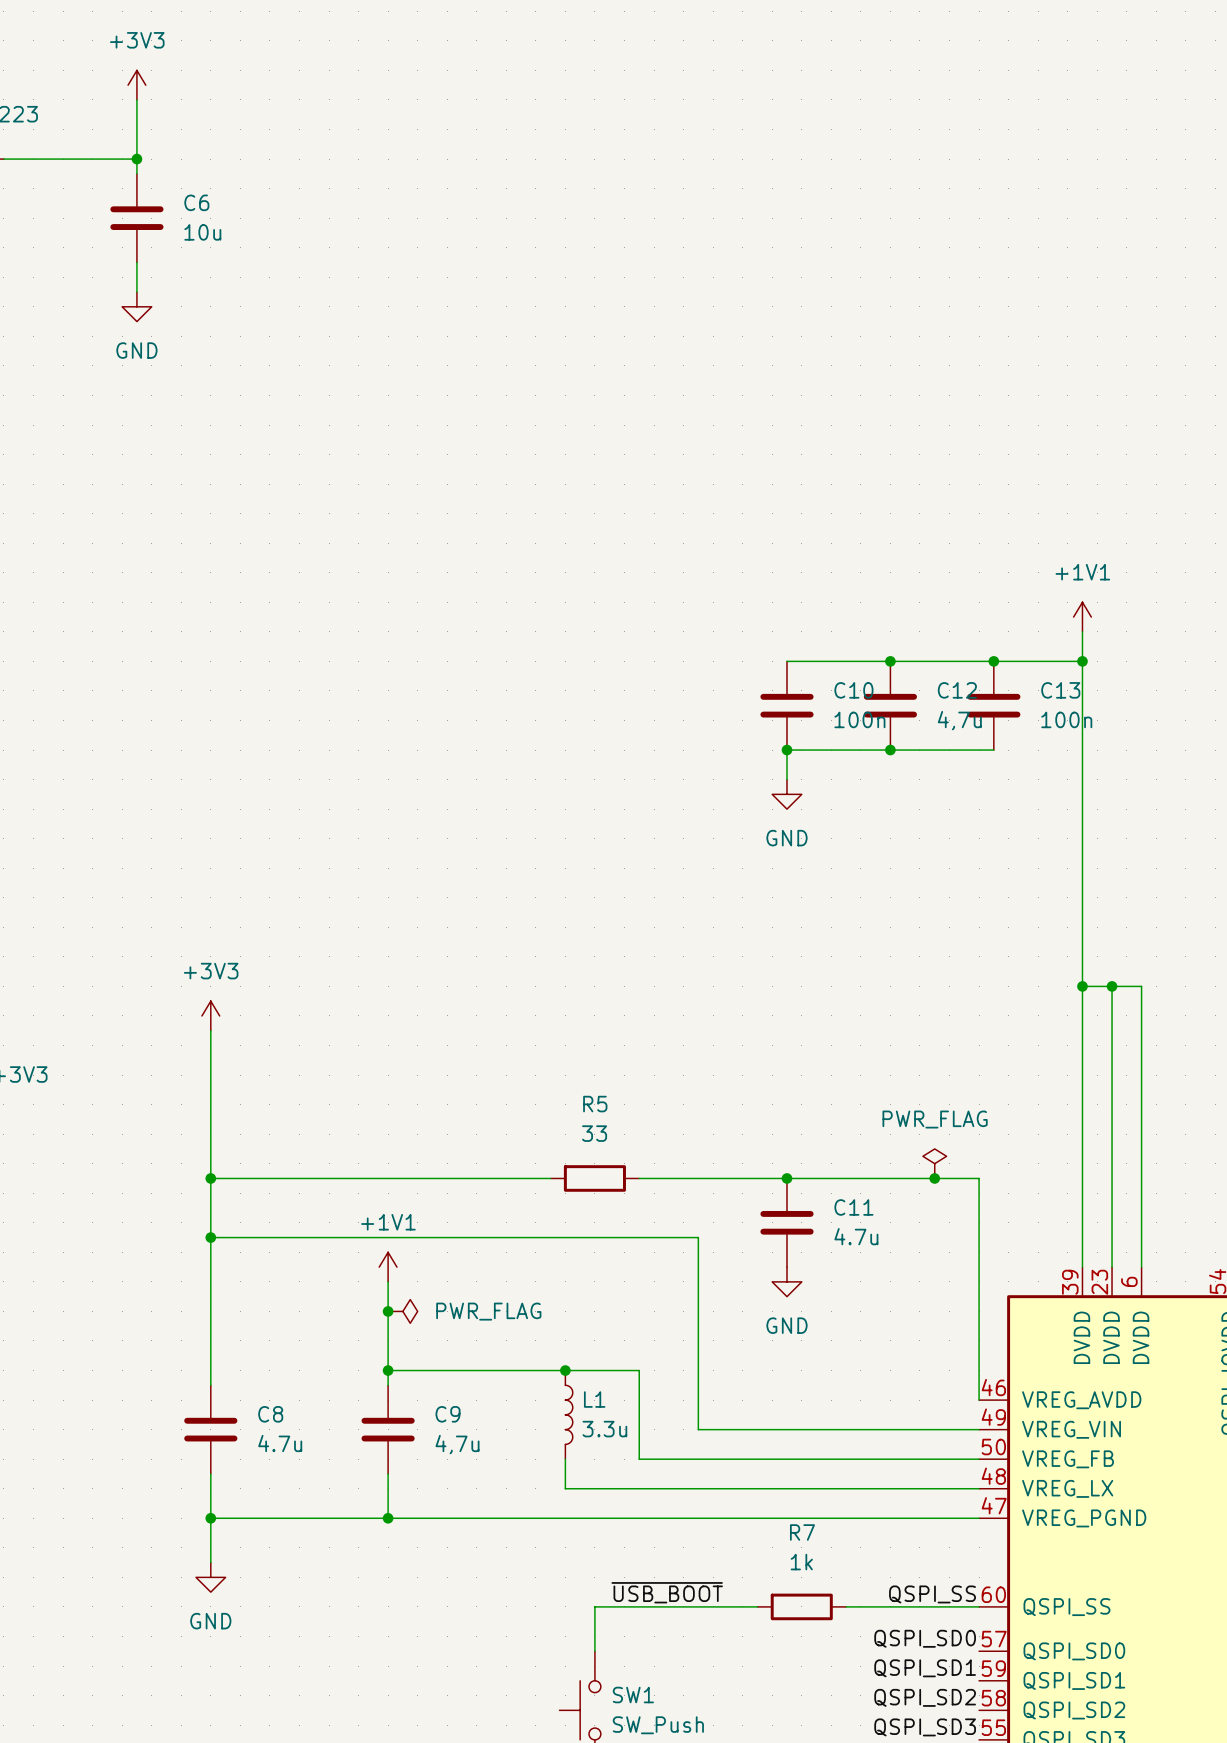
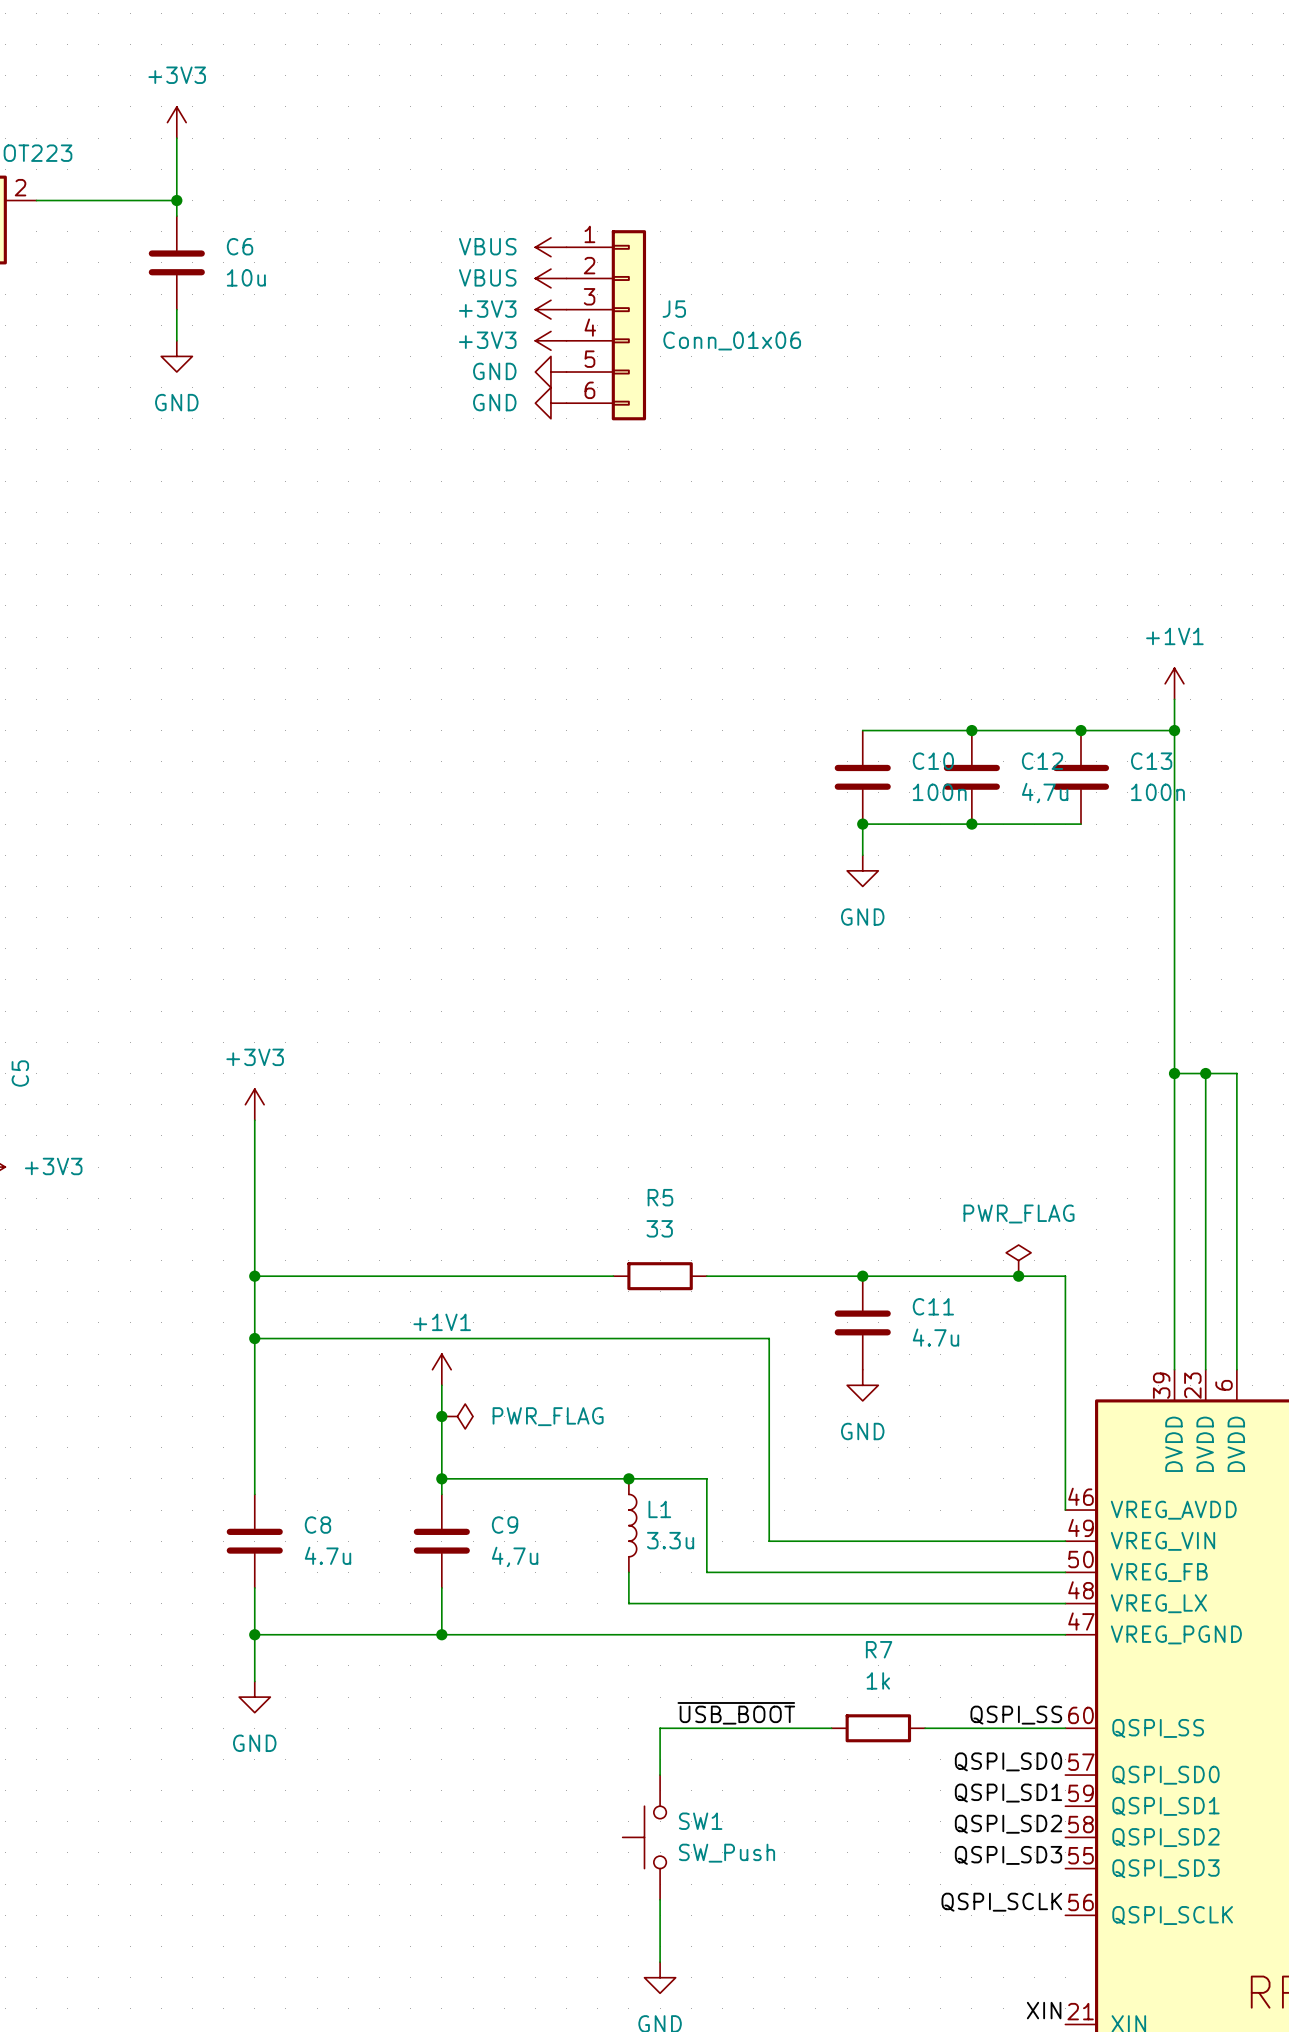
power symbol: none -> VBUS (550, 247)
power symbol: none -> VBUS (550, 278)
power symbol: none -> +3V3 (550, 309)
J5: none -> Conn_01x06 (606, 325)
power symbol: none -> +3V3 (550, 340)
power symbol: none -> GND (550, 372)
power symbol: none -> GND (550, 403)

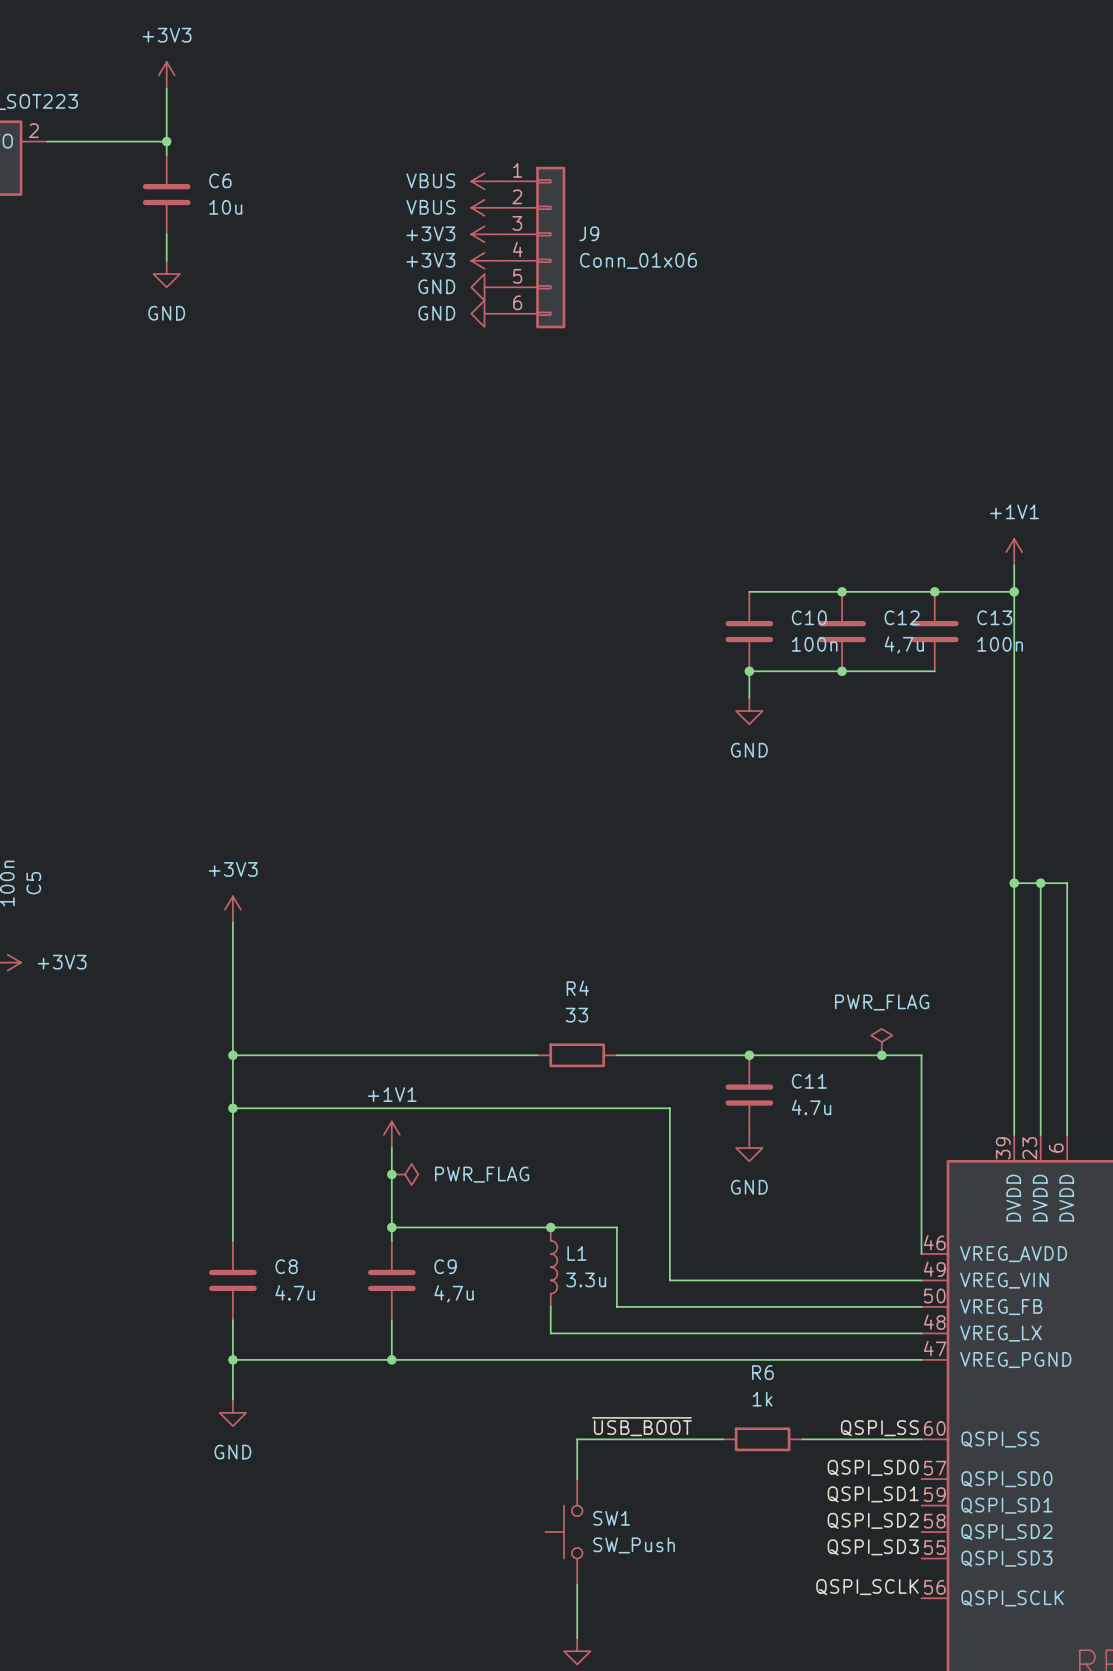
J5 name: J5 (674, 309) -> J9 (589, 233)
R5 name: R5 (660, 1197) -> R4 (577, 988)
R7 name: R7 (879, 1649) -> R6 (762, 1372)

